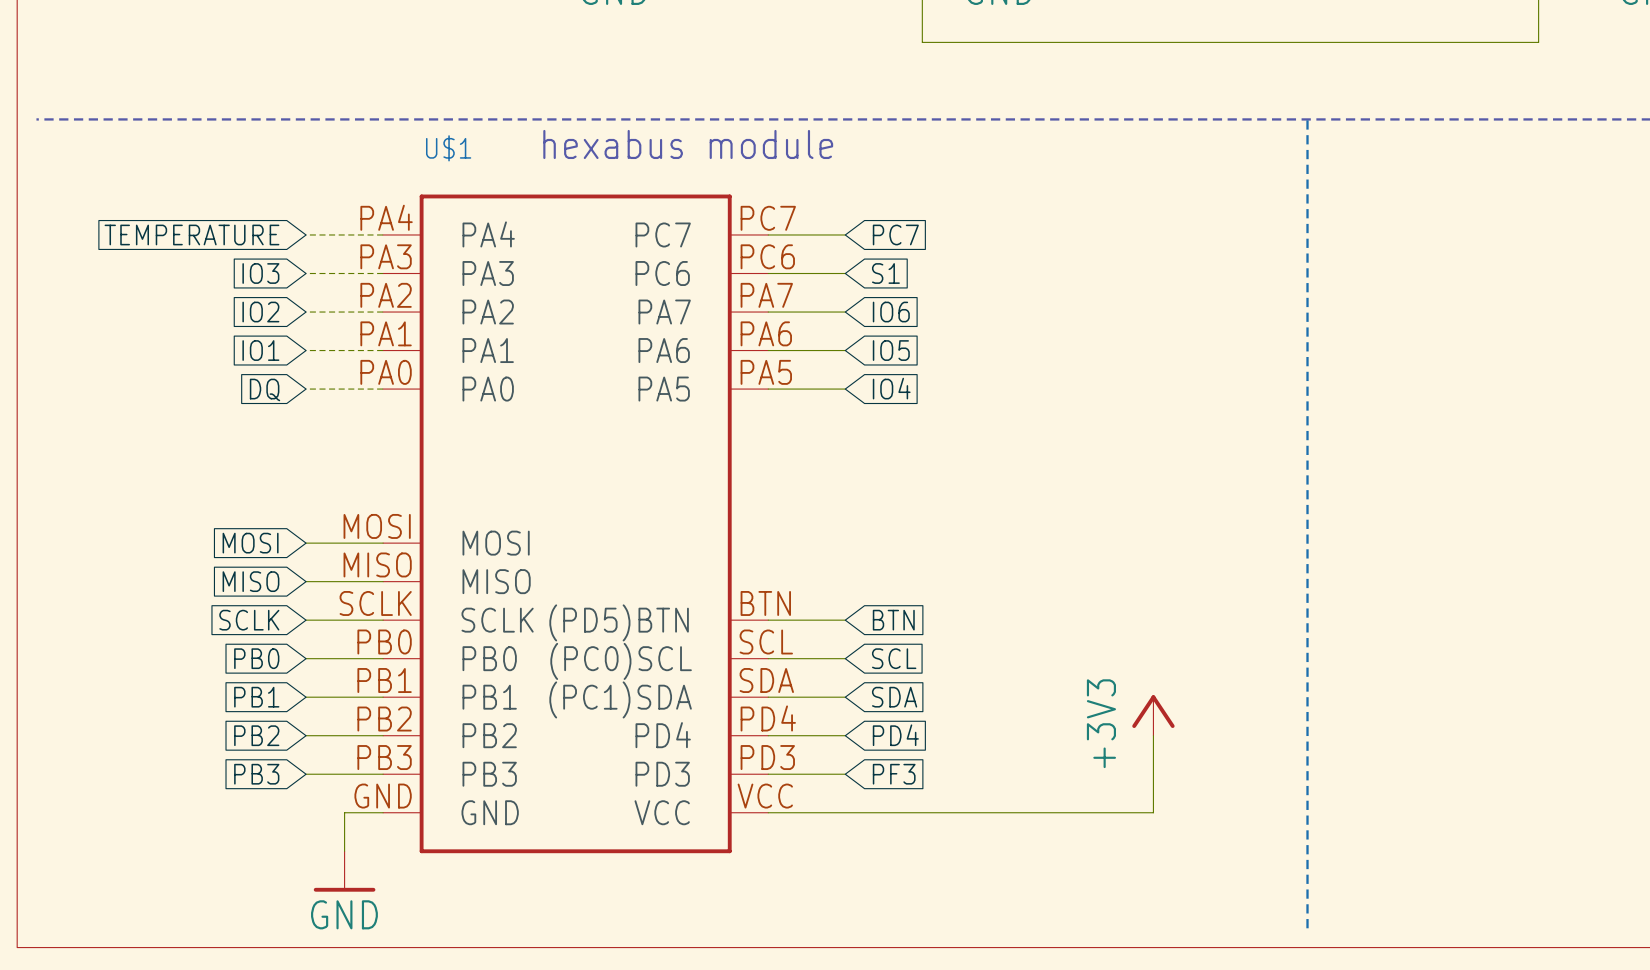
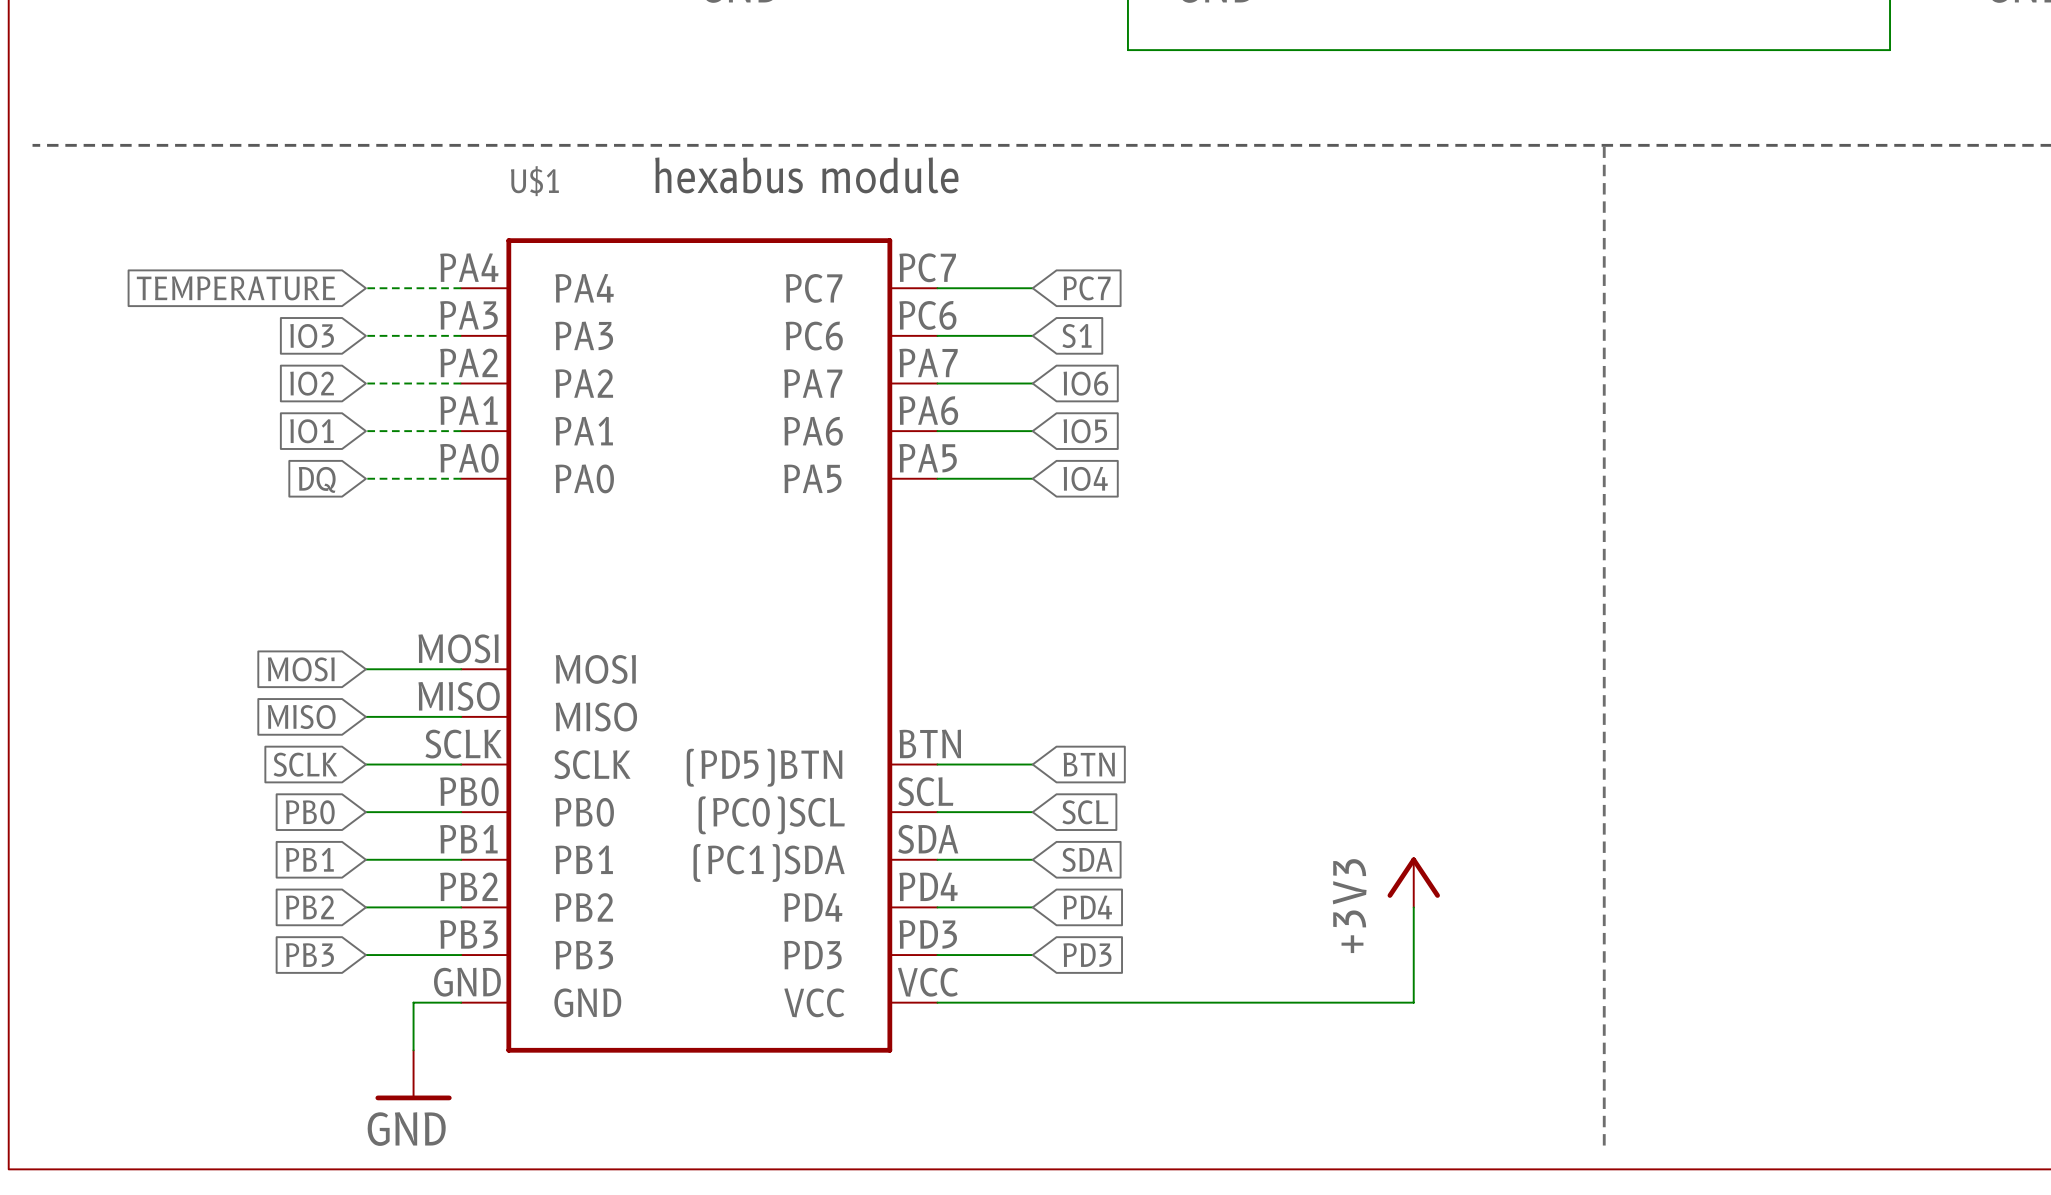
global label: PF3 (894, 774) -> PD3 (1087, 955)

